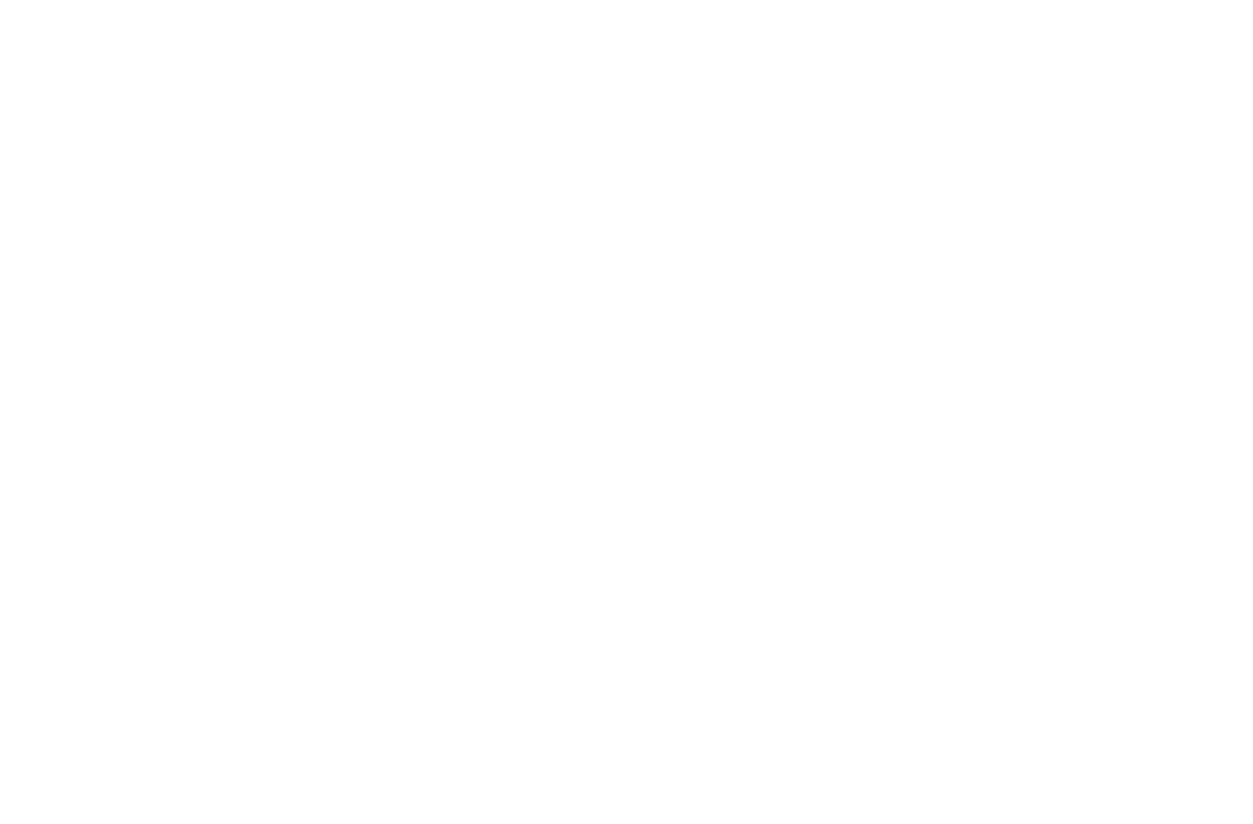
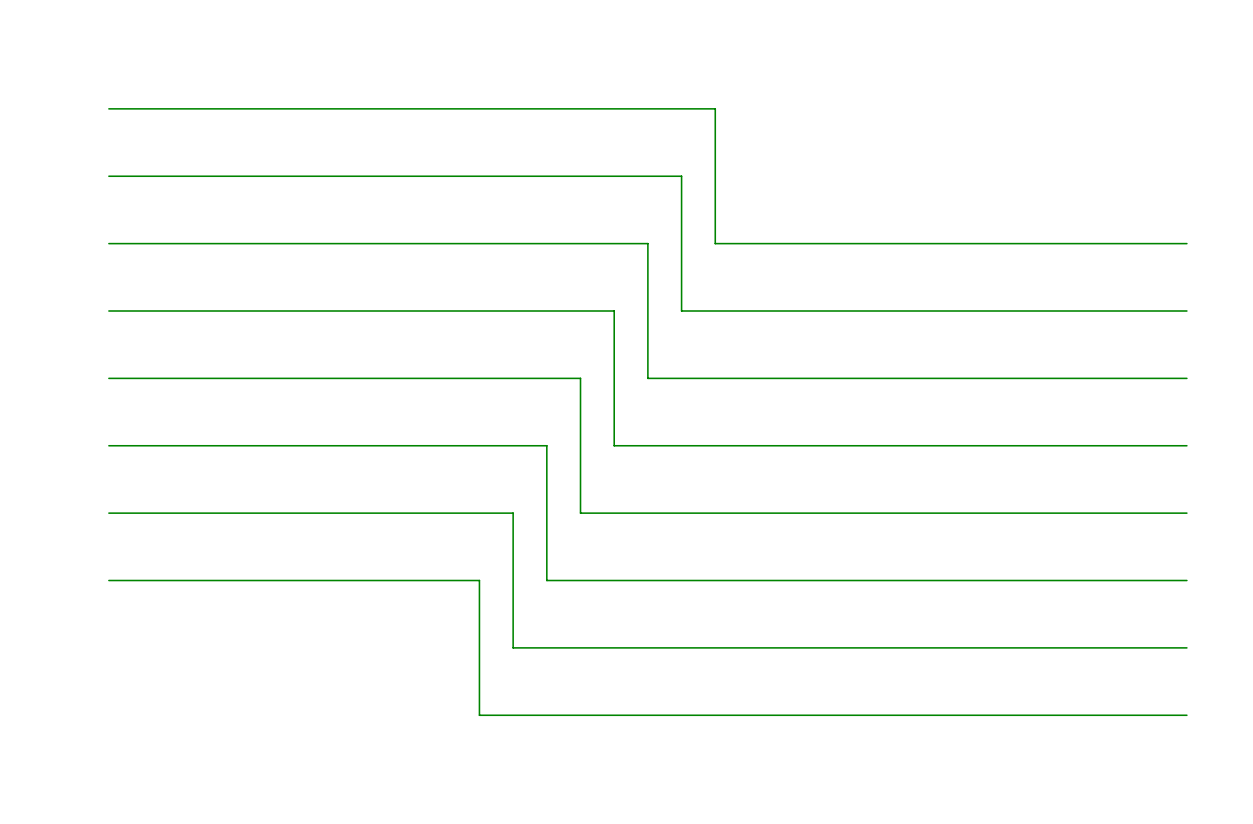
wire: none -> (108, 108) (715, 108) (715, 243) (1186, 243)
wire: none -> (108, 176) (681, 176) (681, 311) (1186, 311)
wire: none -> (108, 243) (647, 243) (647, 378) (1186, 378)
wire: none -> (108, 311) (614, 311) (614, 445) (1186, 445)
wire: none -> (108, 378) (580, 378) (580, 513) (1186, 513)
wire: none -> (108, 445) (546, 445) (546, 580) (1186, 580)
wire: none -> (108, 513) (513, 513) (513, 647) (1186, 647)
wire: none -> (108, 580) (479, 580) (479, 715) (1186, 715)

